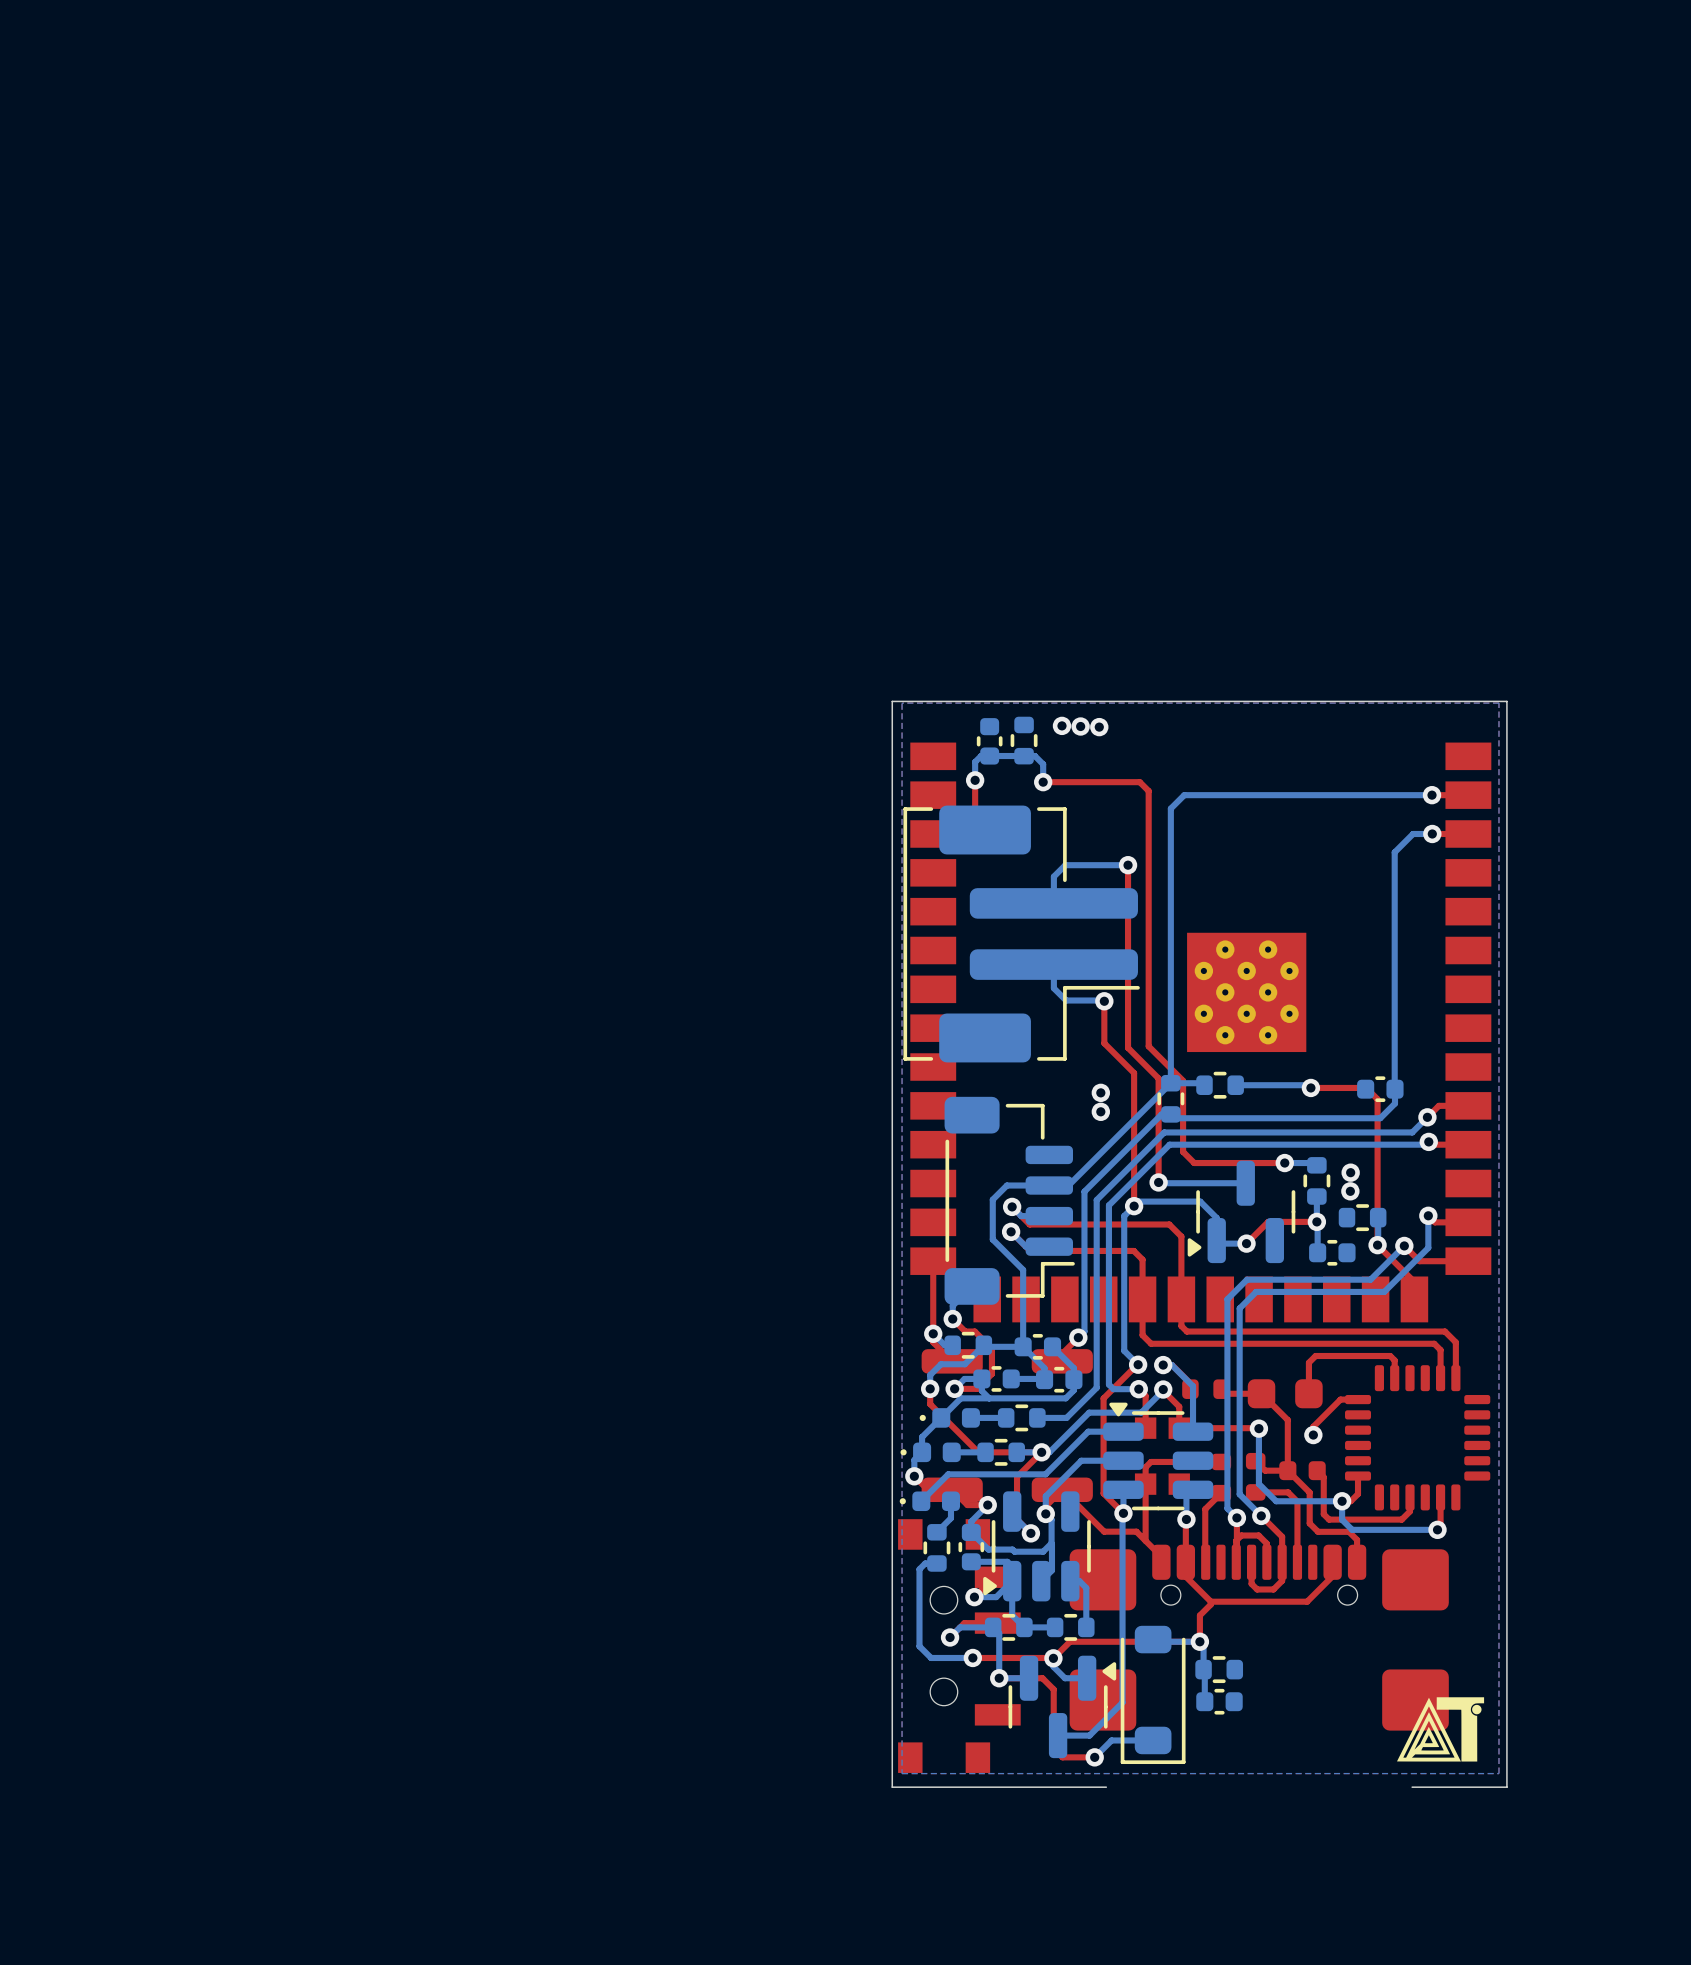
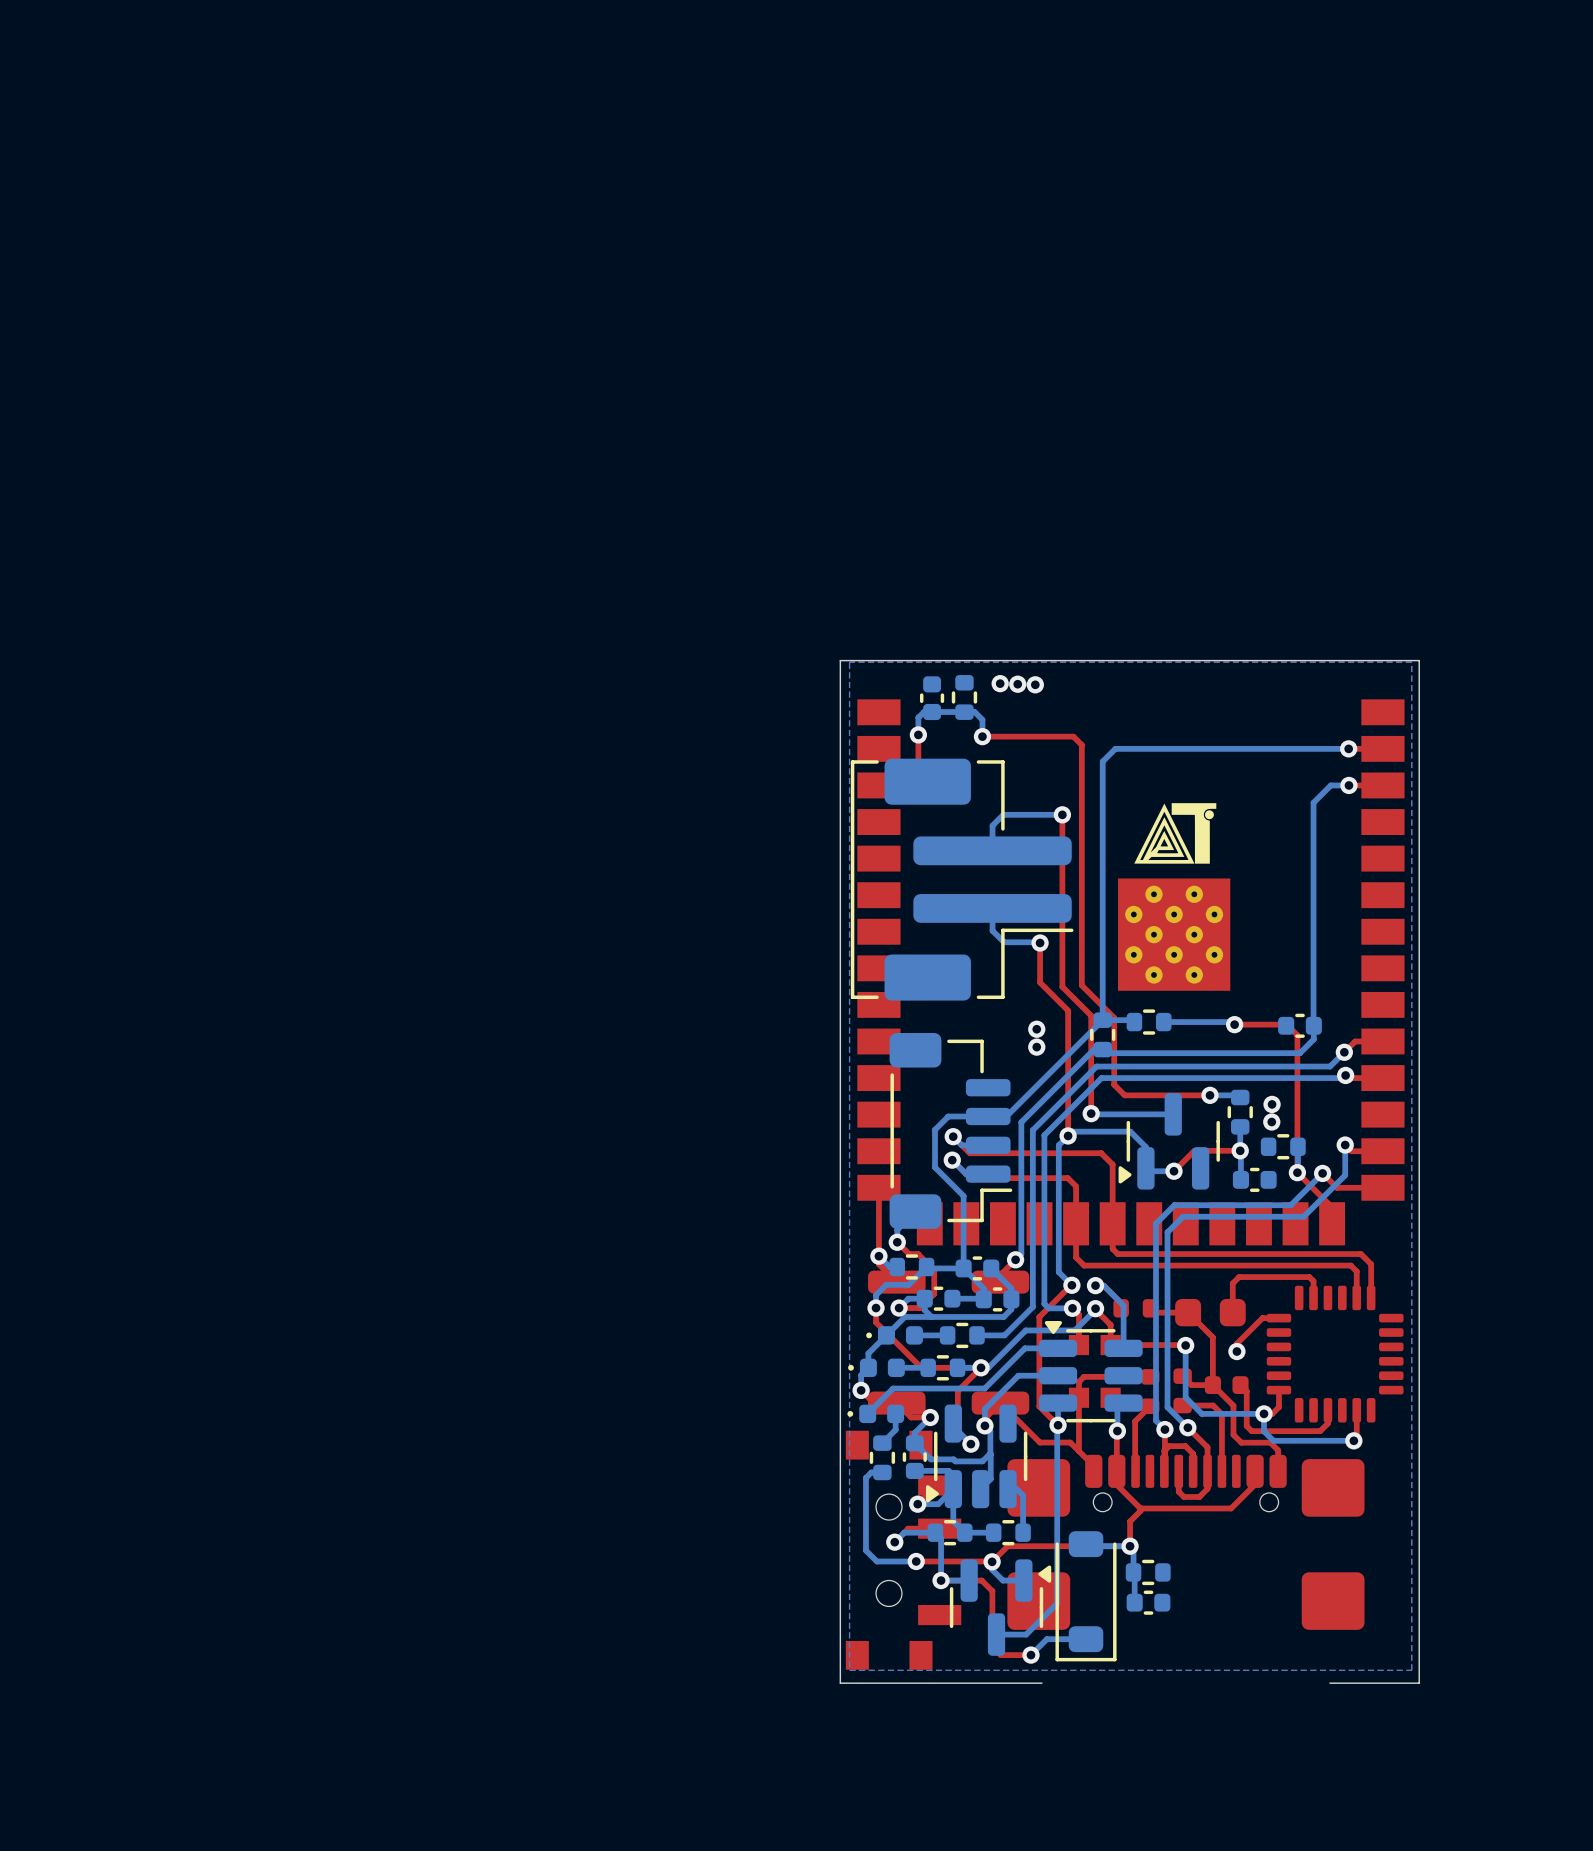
drawing: none -> [1134, 803, 1217, 864]
drawing: [1397, 1697, 1485, 1762] -> none

